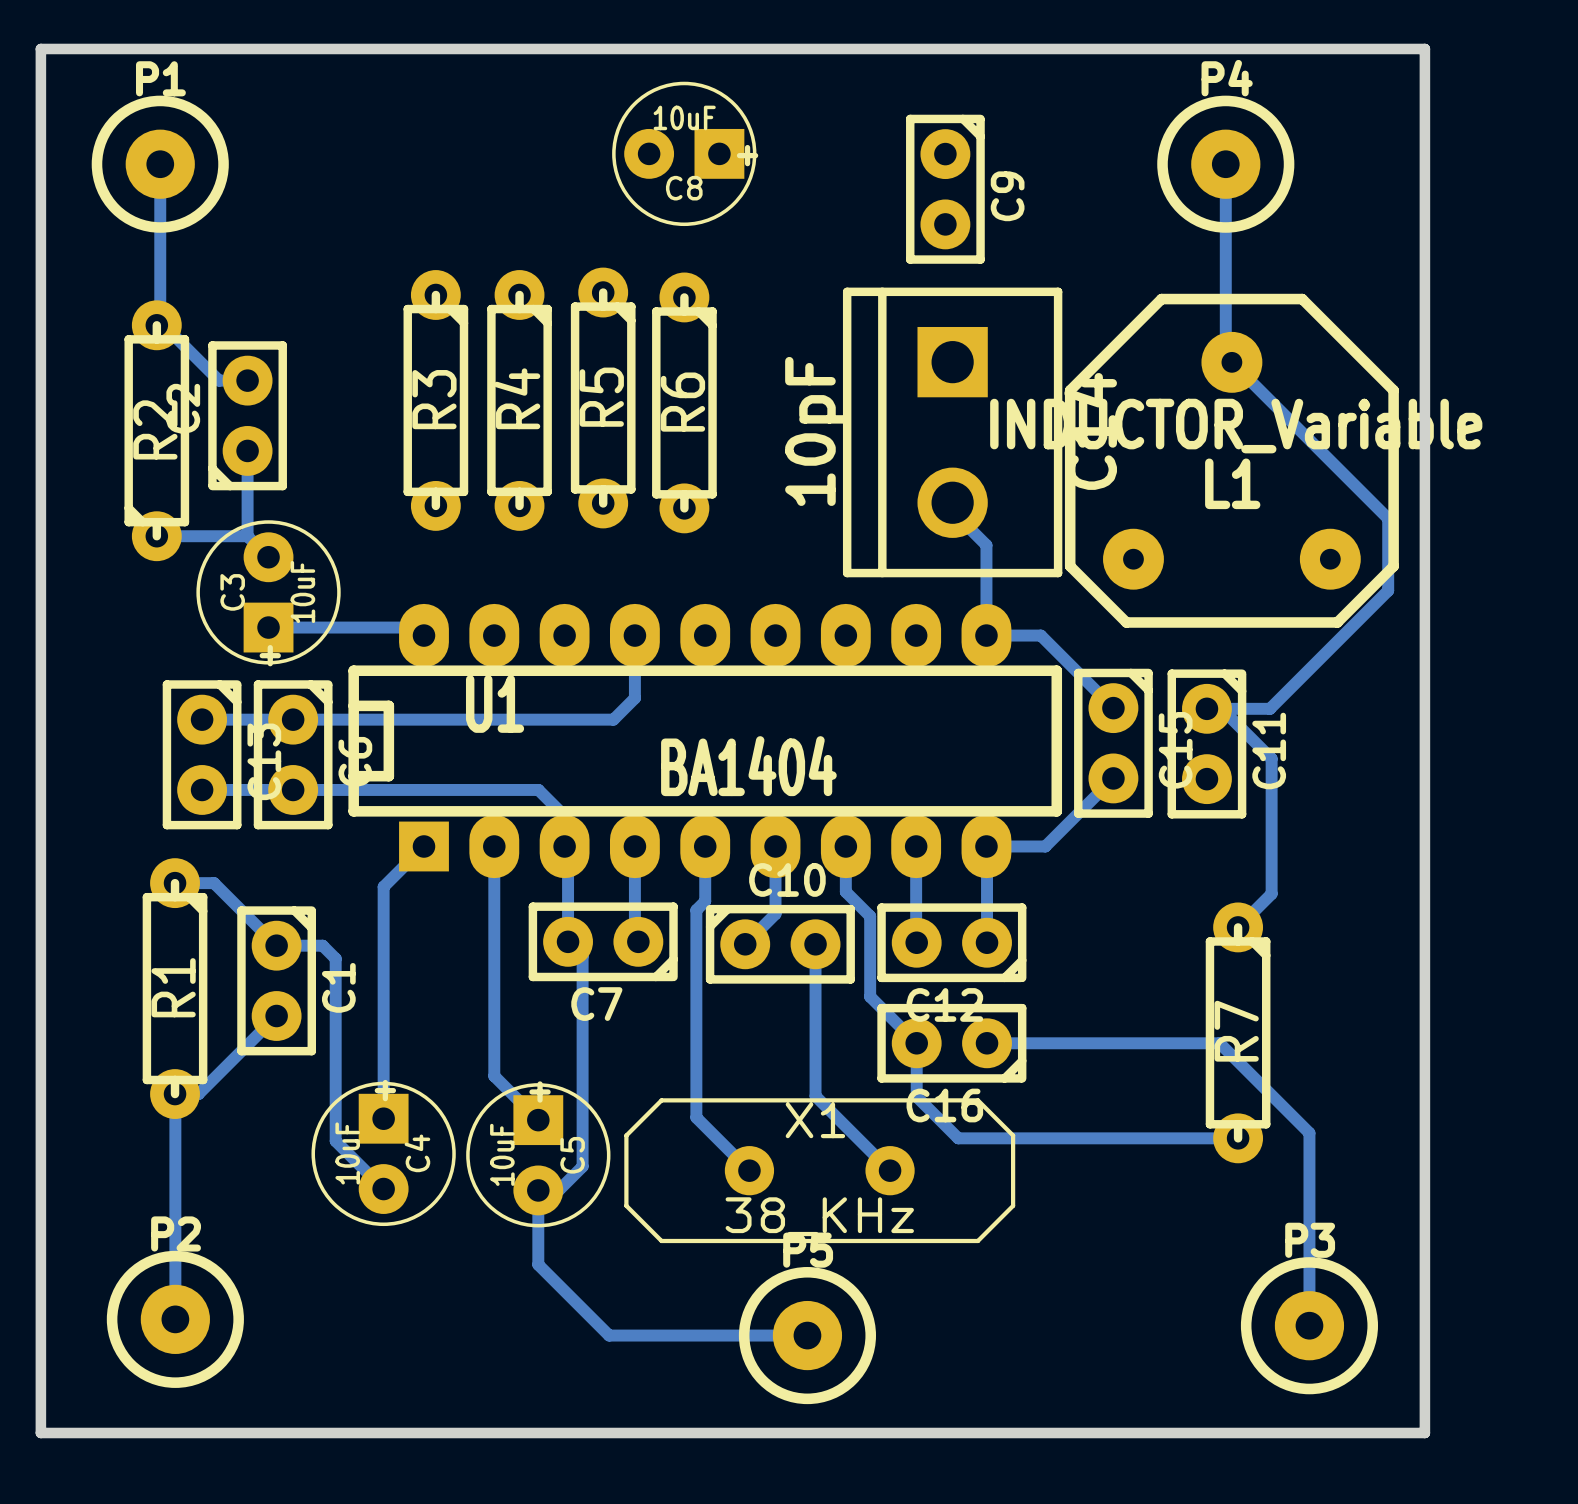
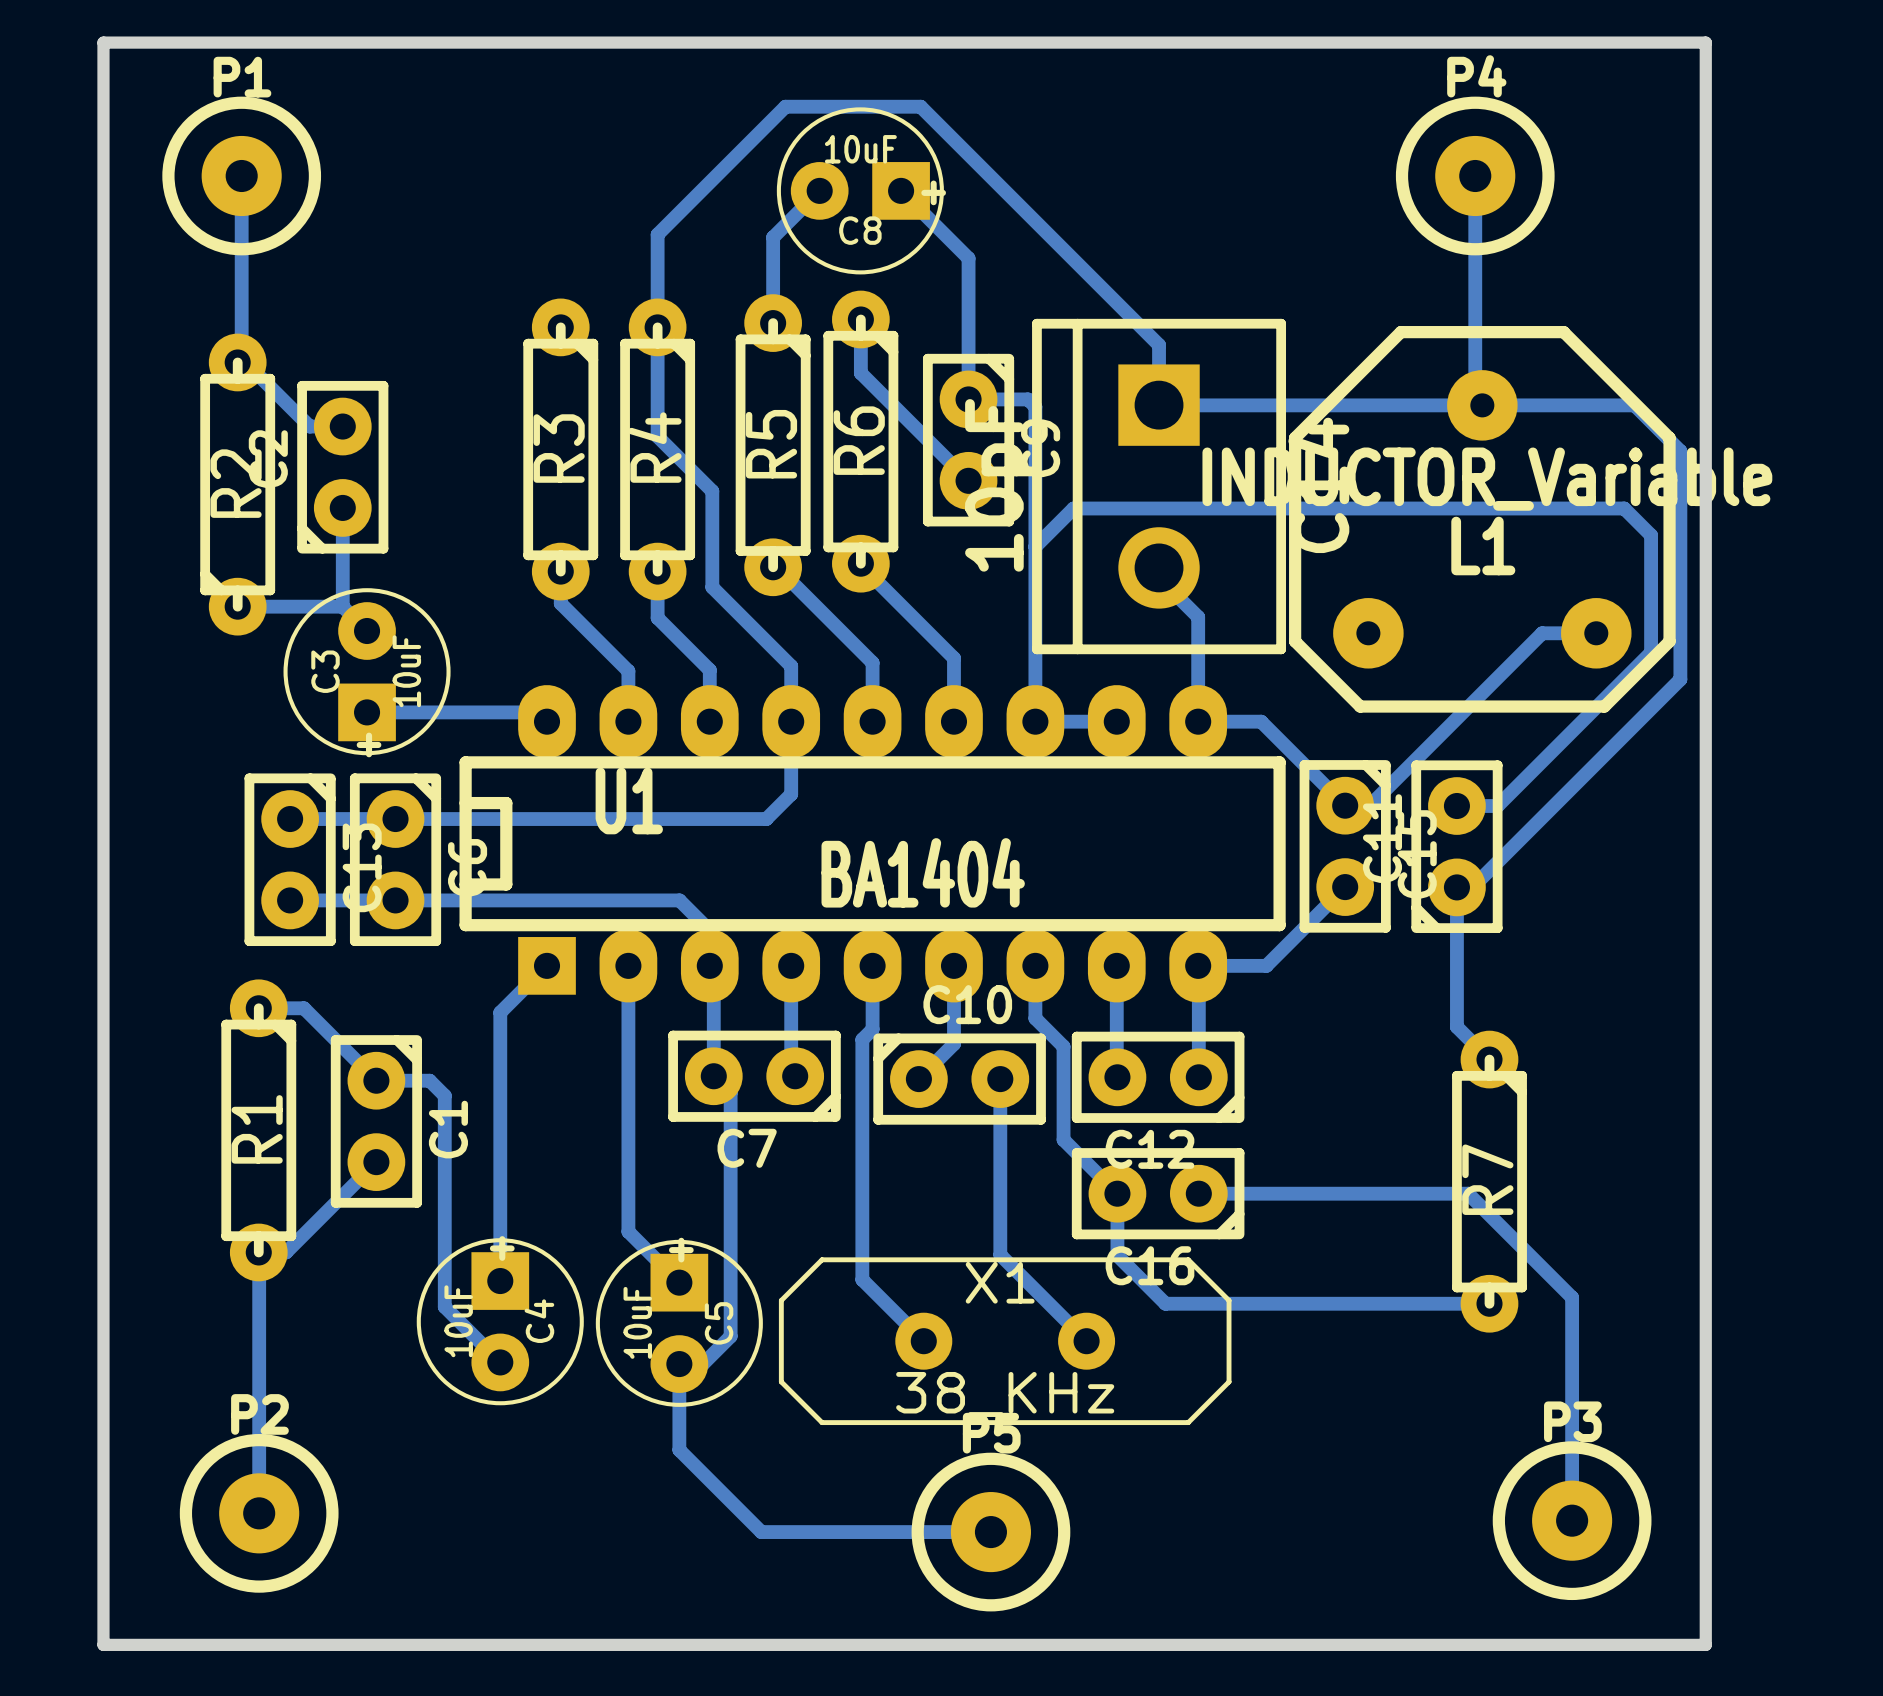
C8 position: (684, 153) -> (860, 190)
bottom track: none -> (819, 190) (773, 237) (773, 323)
bottom track: none -> (901, 190) (968, 258) (968, 399) (1027, 399) (1035, 406) (1035, 721) (1116, 721)
C9 position: (945, 189) -> (968, 440)
R5 footprint: [570, 267, 636, 529] -> [735, 294, 811, 597]
bottom track: none -> (860, 319) (860, 373) (968, 480)
bottom track: none -> (1159, 405) (1159, 345) (920, 106) (785, 106) (657, 234) (657, 436) (712, 491) (712, 587) (791, 666) (791, 721)
bottom track: (1231, 362) (1388, 518) (1388, 590) (1270, 708) (1206, 708) -> none
R5 name position: R5 (601, 397) -> R5 (771, 444)
R6 position: (684, 402) -> (860, 441)
bottom track: none -> (1035, 546) (1073, 508) (1624, 508) (1651, 535) (1651, 652) (1497, 806) (1456, 806)
bottom track: none -> (860, 563) (953, 658) (953, 721)
bottom track: none -> (773, 567) (777, 567) (872, 662) (872, 721)
bottom track: none -> (560, 571) (560, 603) (628, 671) (628, 721)
bottom track: none -> (657, 571) (657, 617) (709, 670) (709, 721)
bottom track: none -> (1596, 633) (1542, 633) (1369, 805) (1345, 805)
bottom track: (1221, 708) (1271, 758) (1271, 893) (1238, 927) -> (1159, 405) (1634, 405) (1680, 451) (1680, 679) (1472, 887) (1456, 887) (1456, 1027) (1489, 1059)
C11 rotation: 0° (1206, 743) -> 180° (1456, 846)

